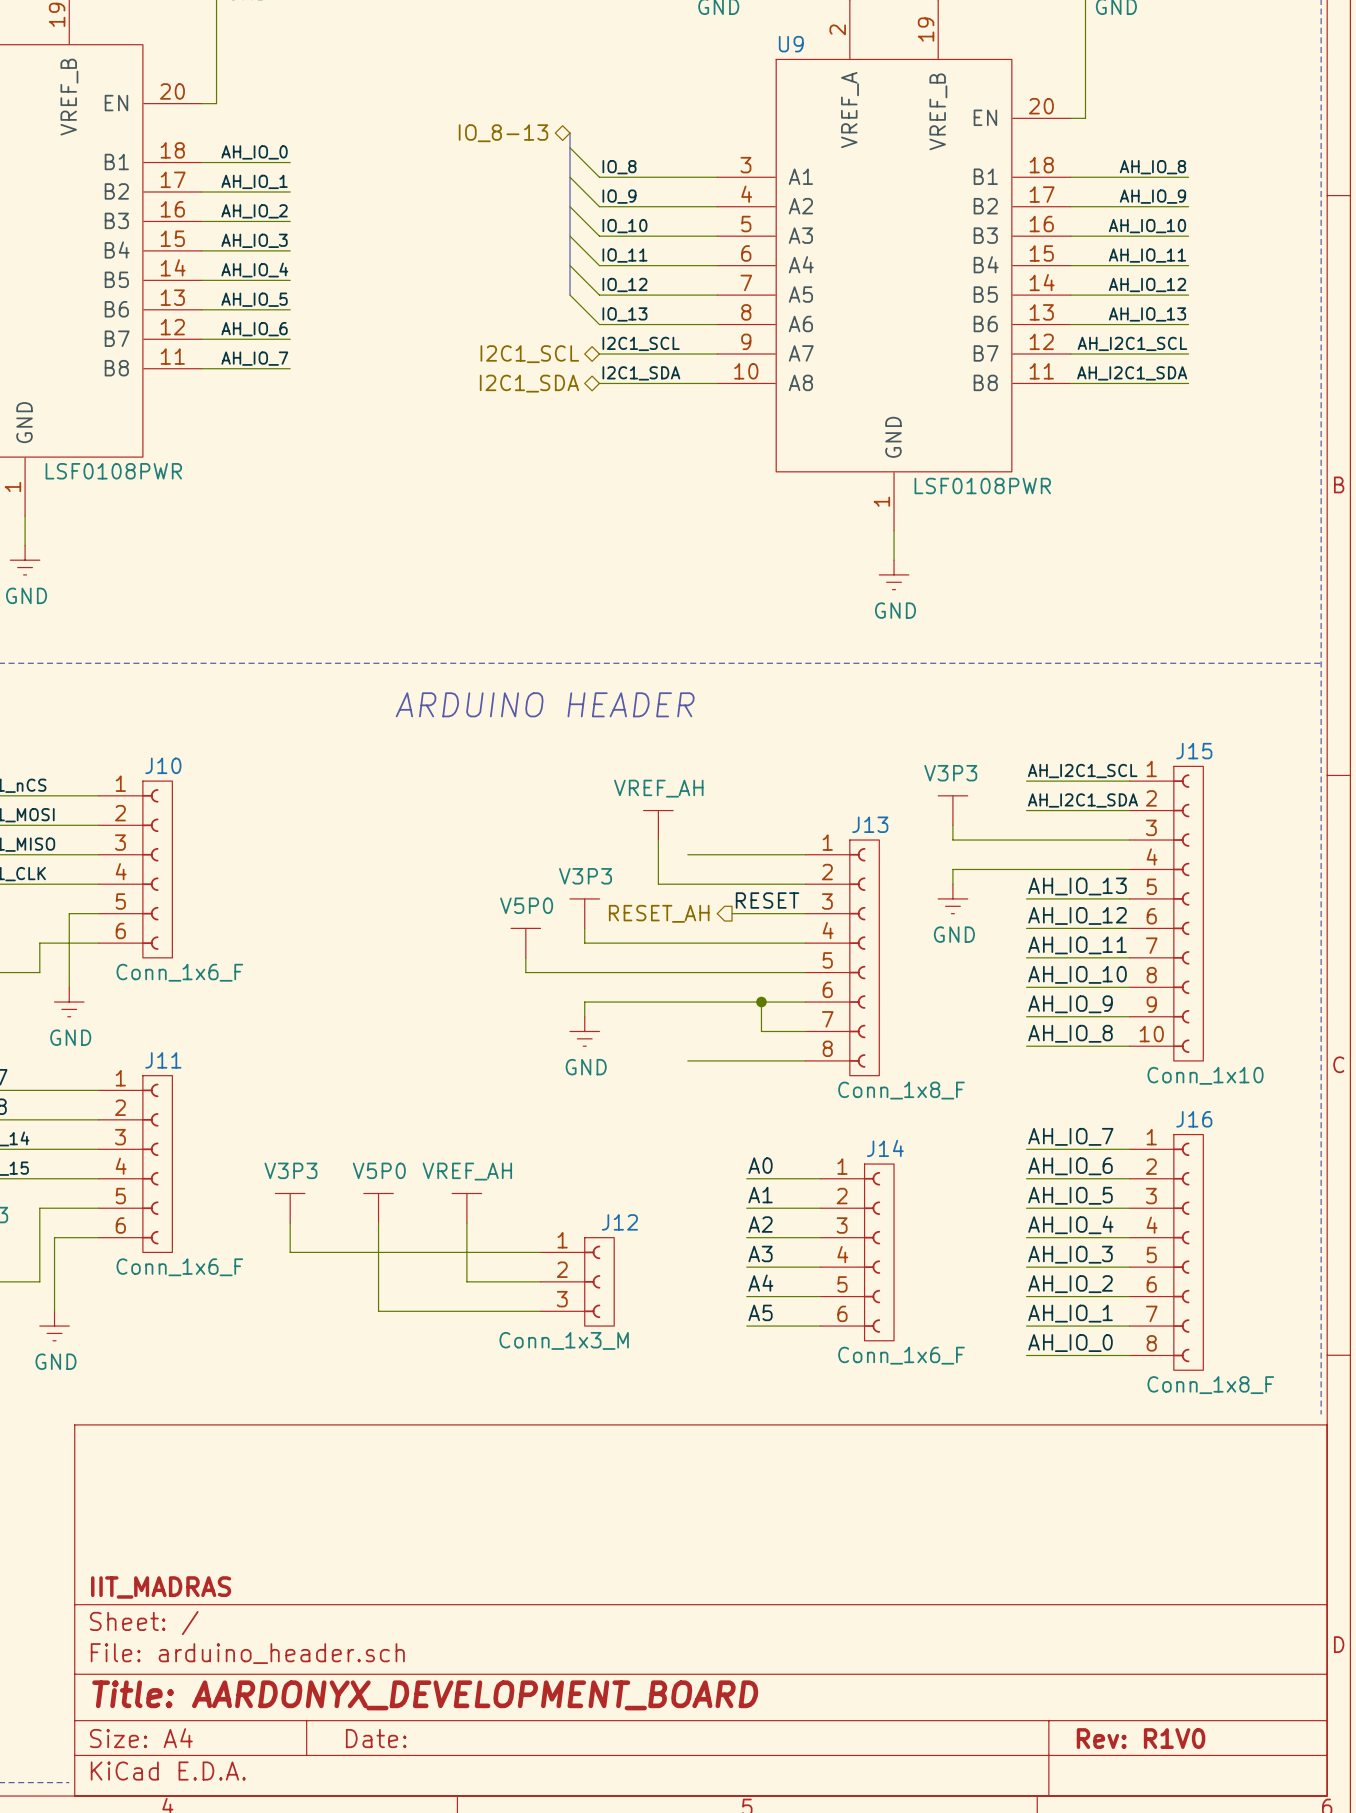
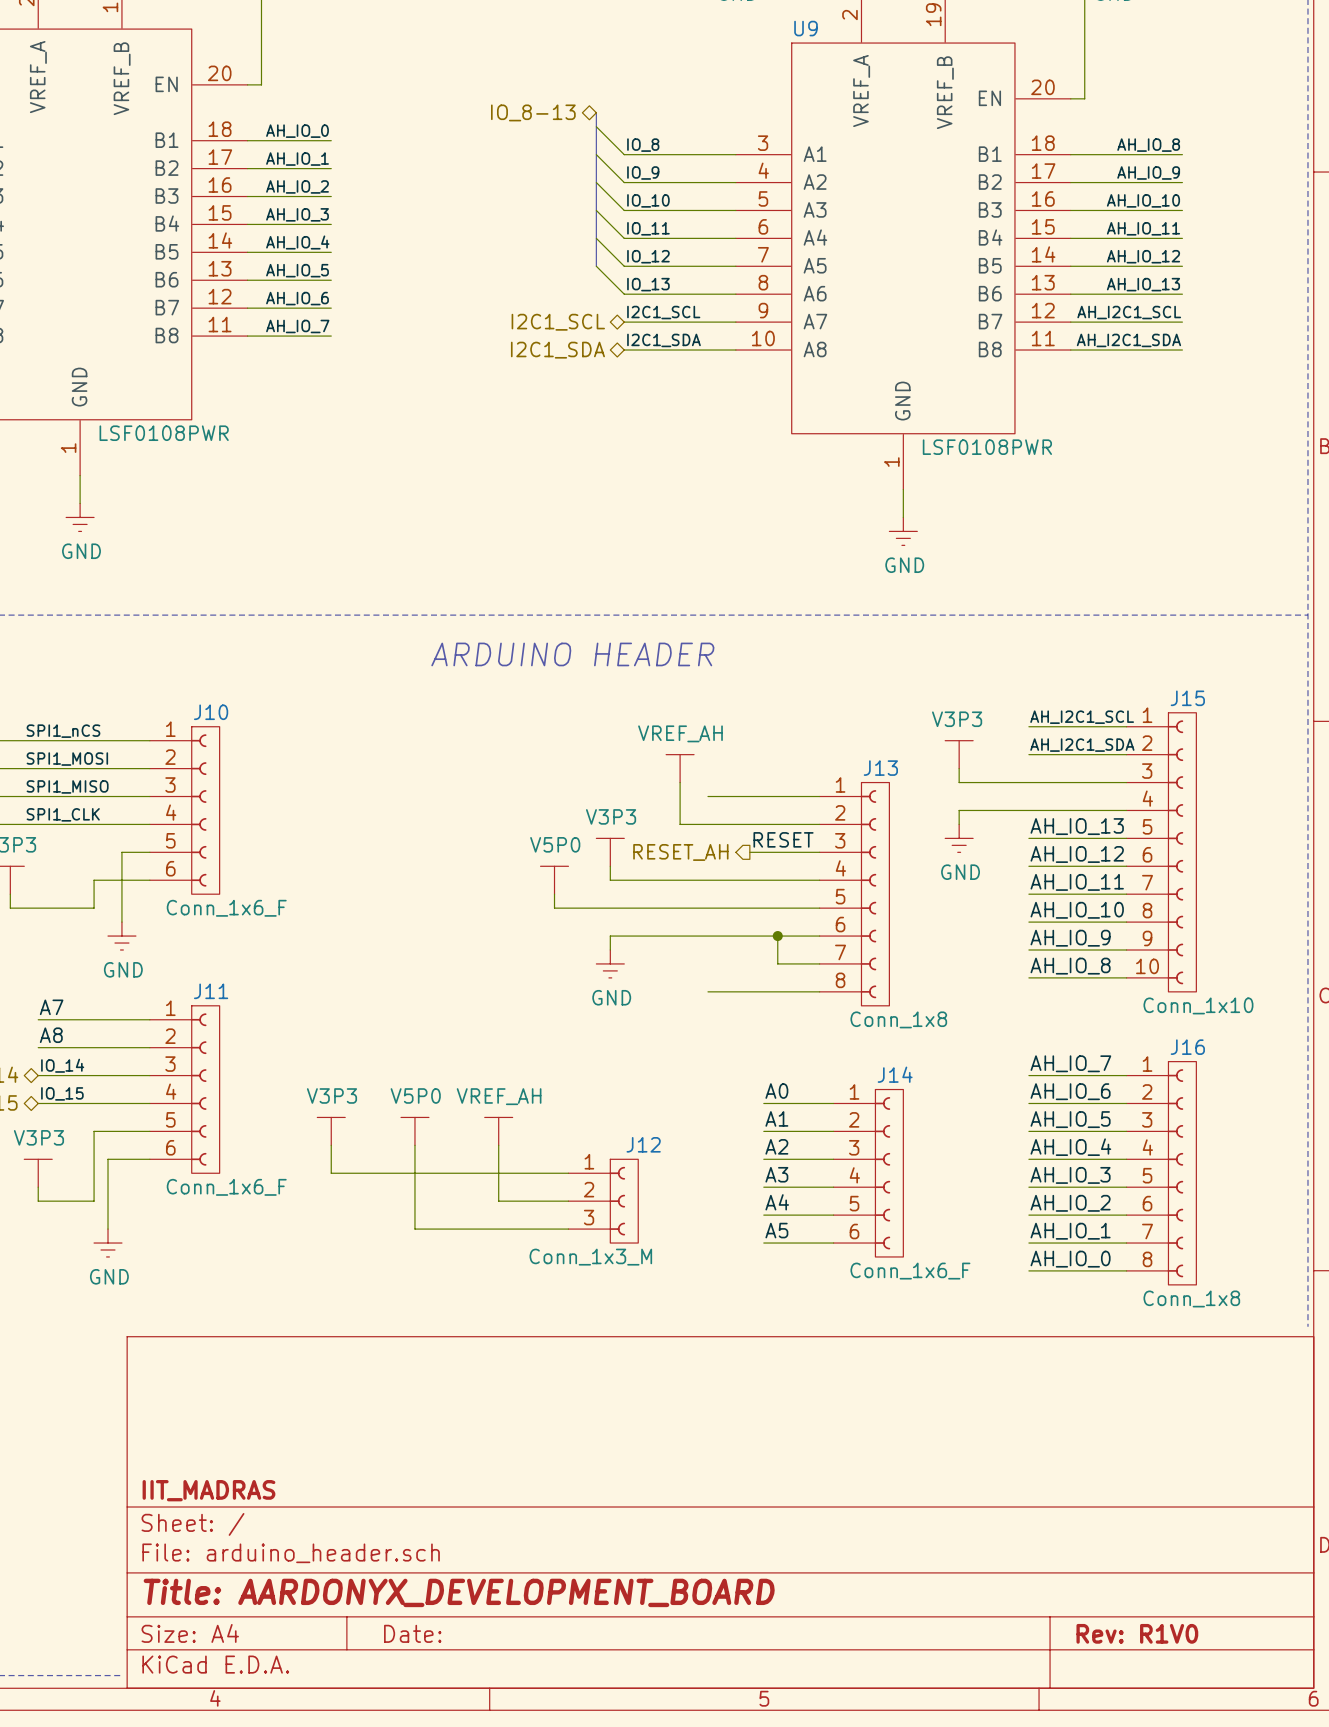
J13 value: Conn_1x8_F (901, 1090) -> Conn_1x8 (898, 1019)
J16 value: Conn_1x8_F (1210, 1385) -> Conn_1x8 (1191, 1298)

